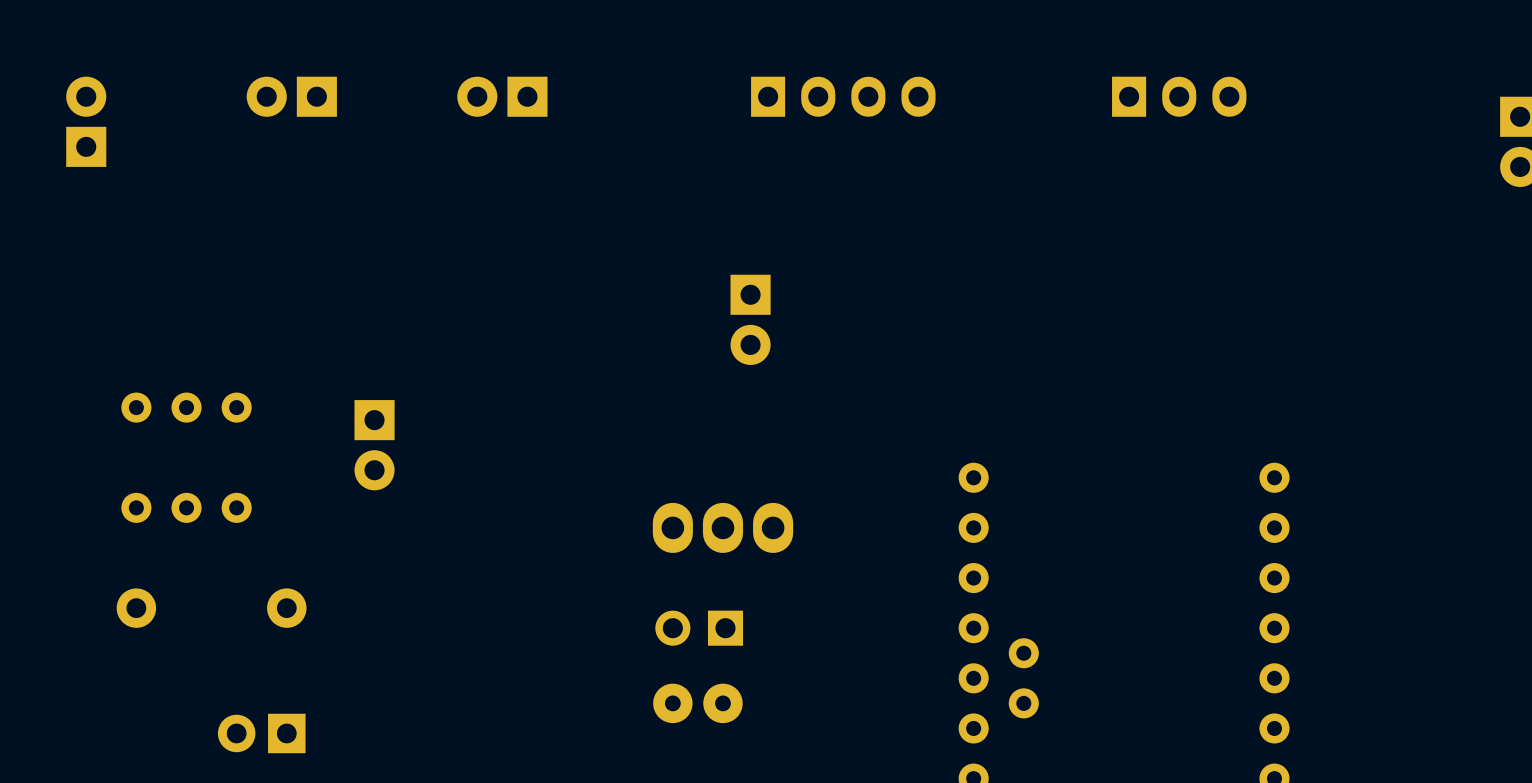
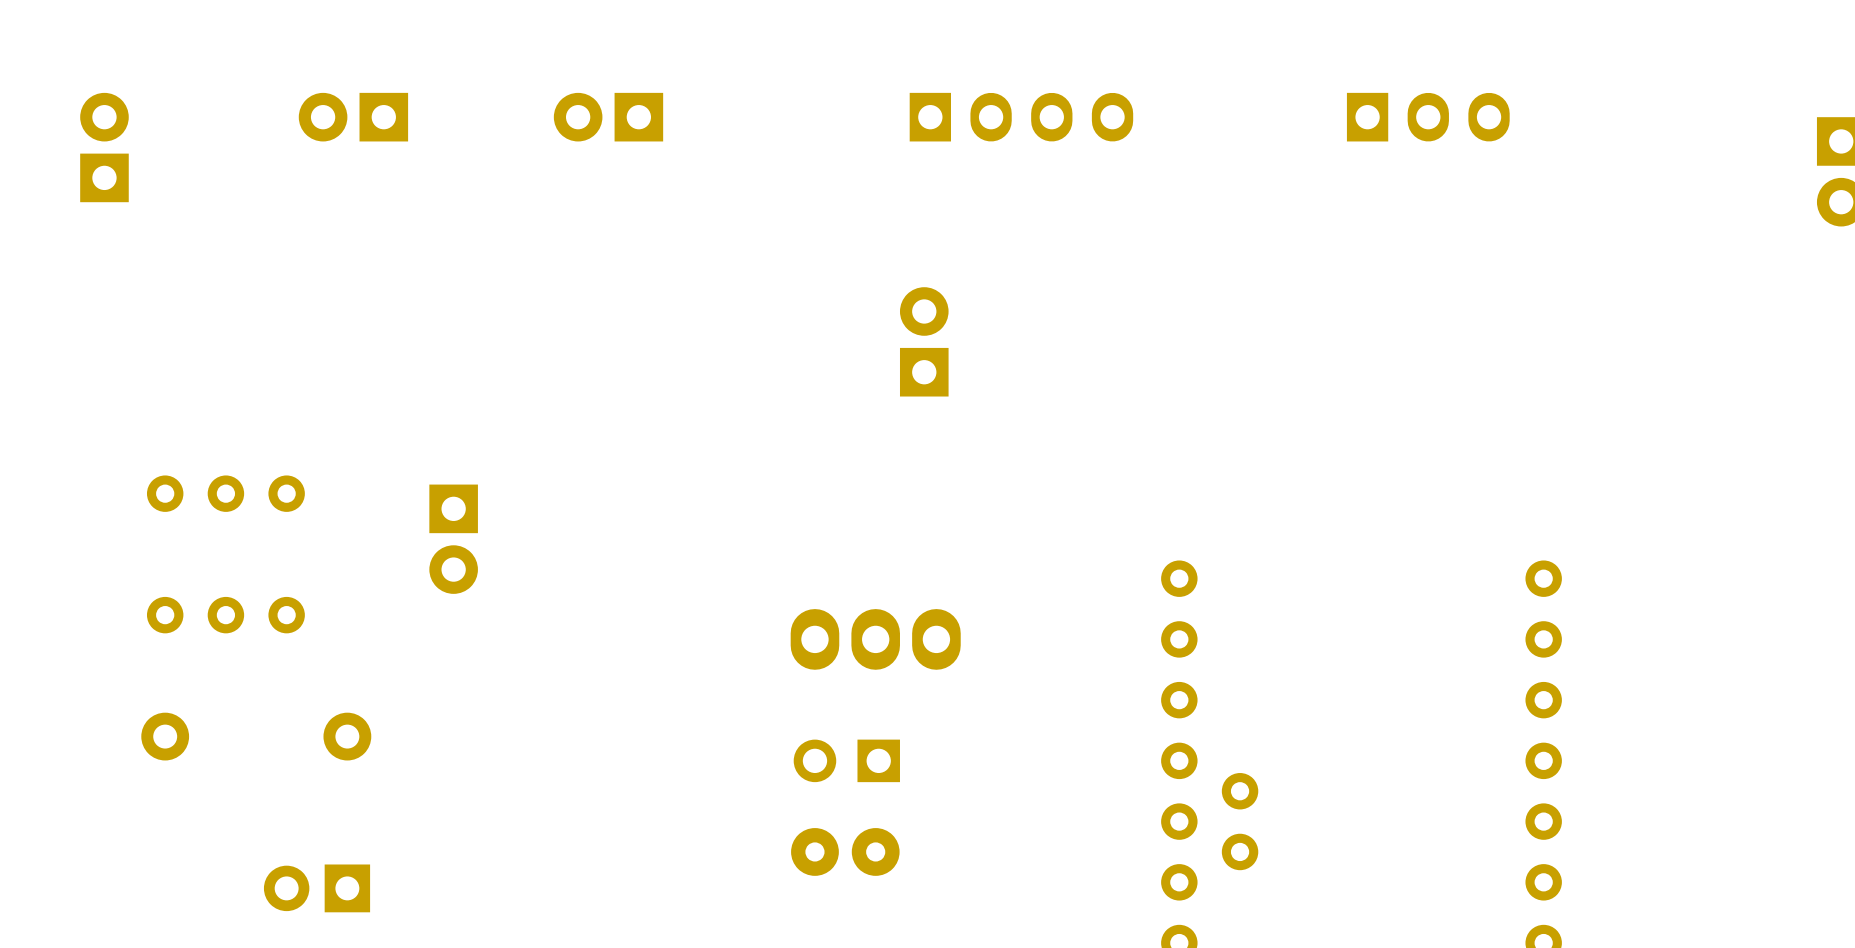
part rotation: 0° (750, 319) -> 180° (924, 341)

